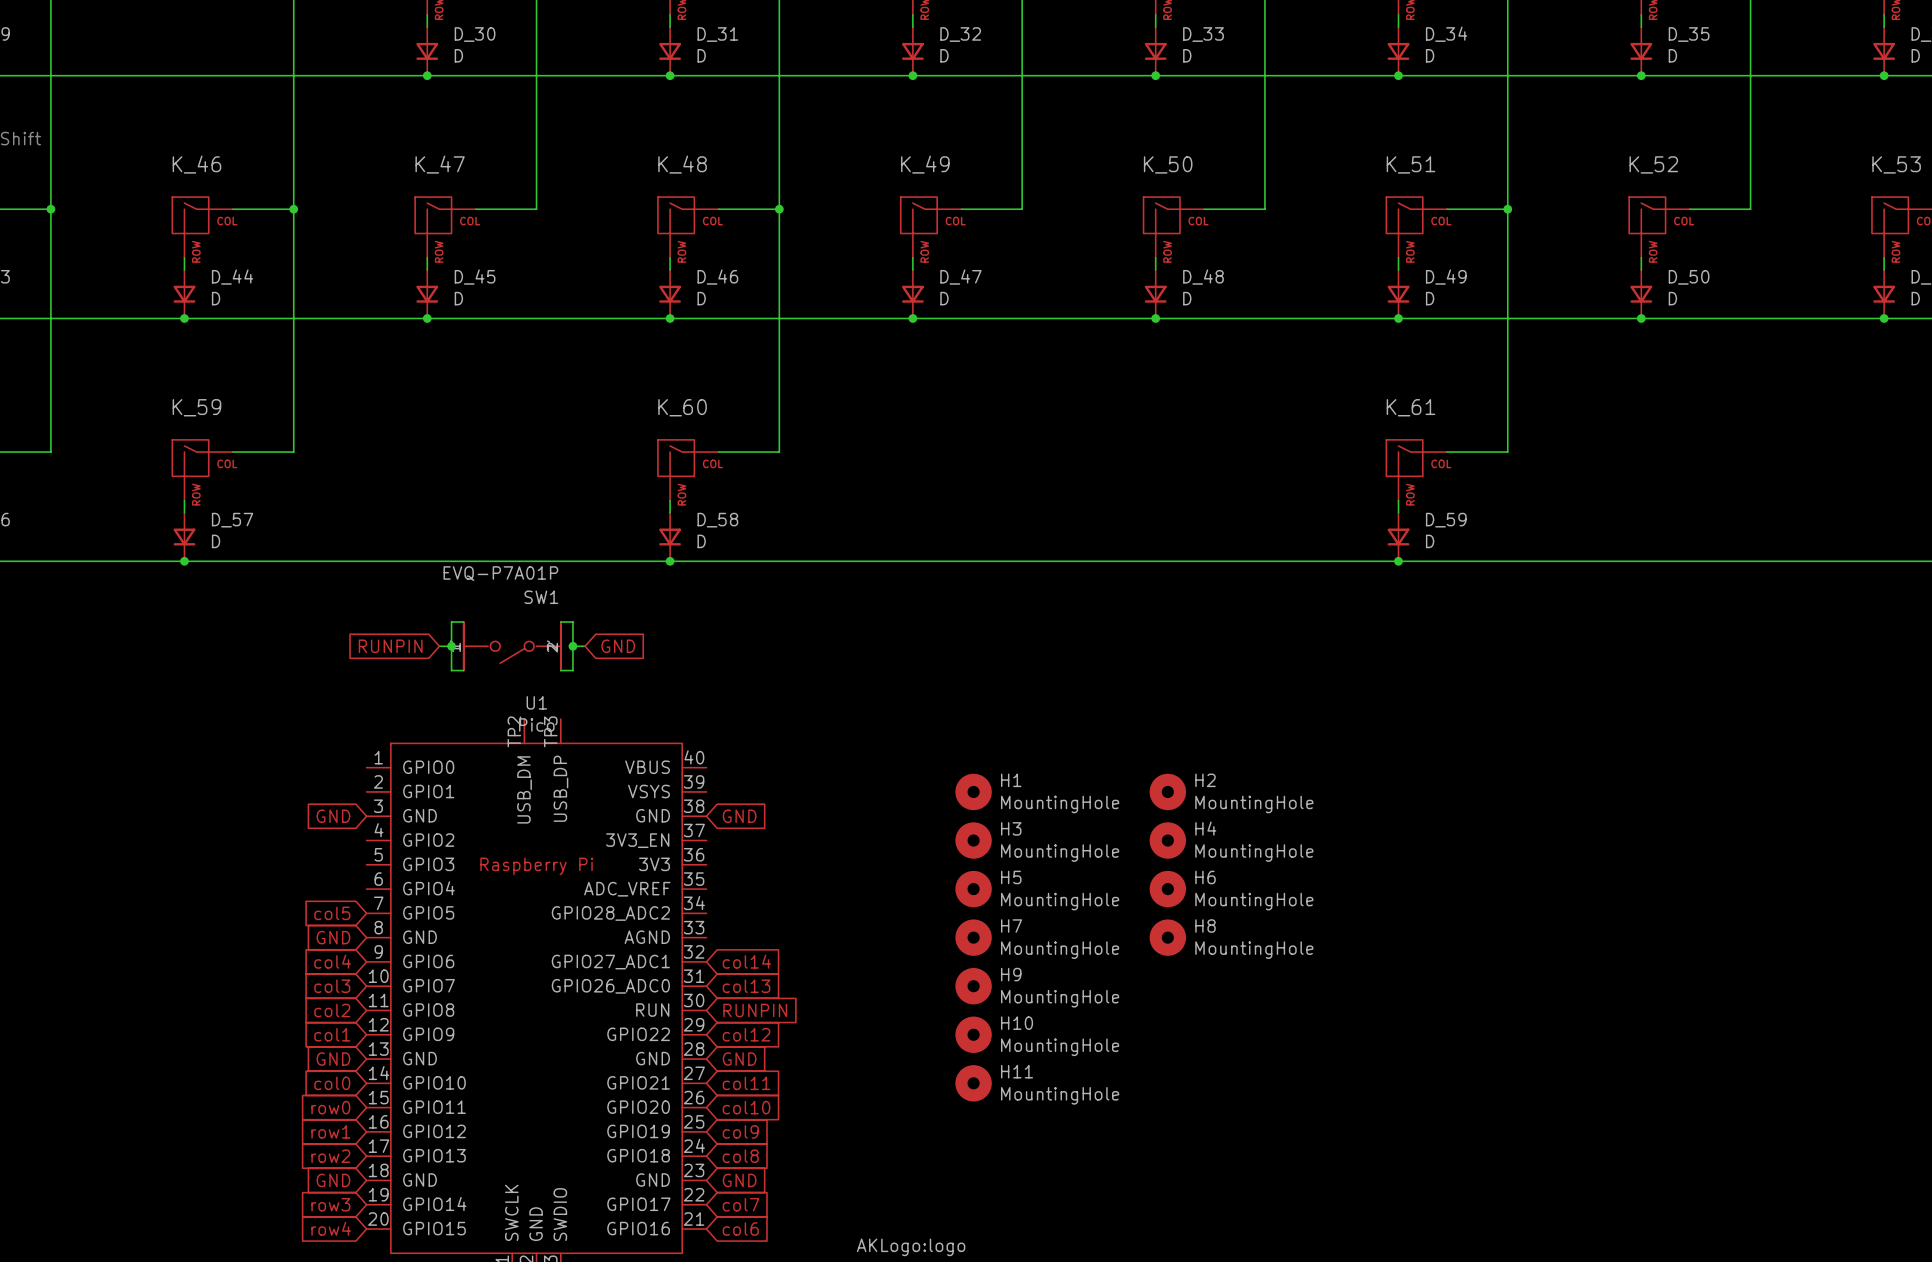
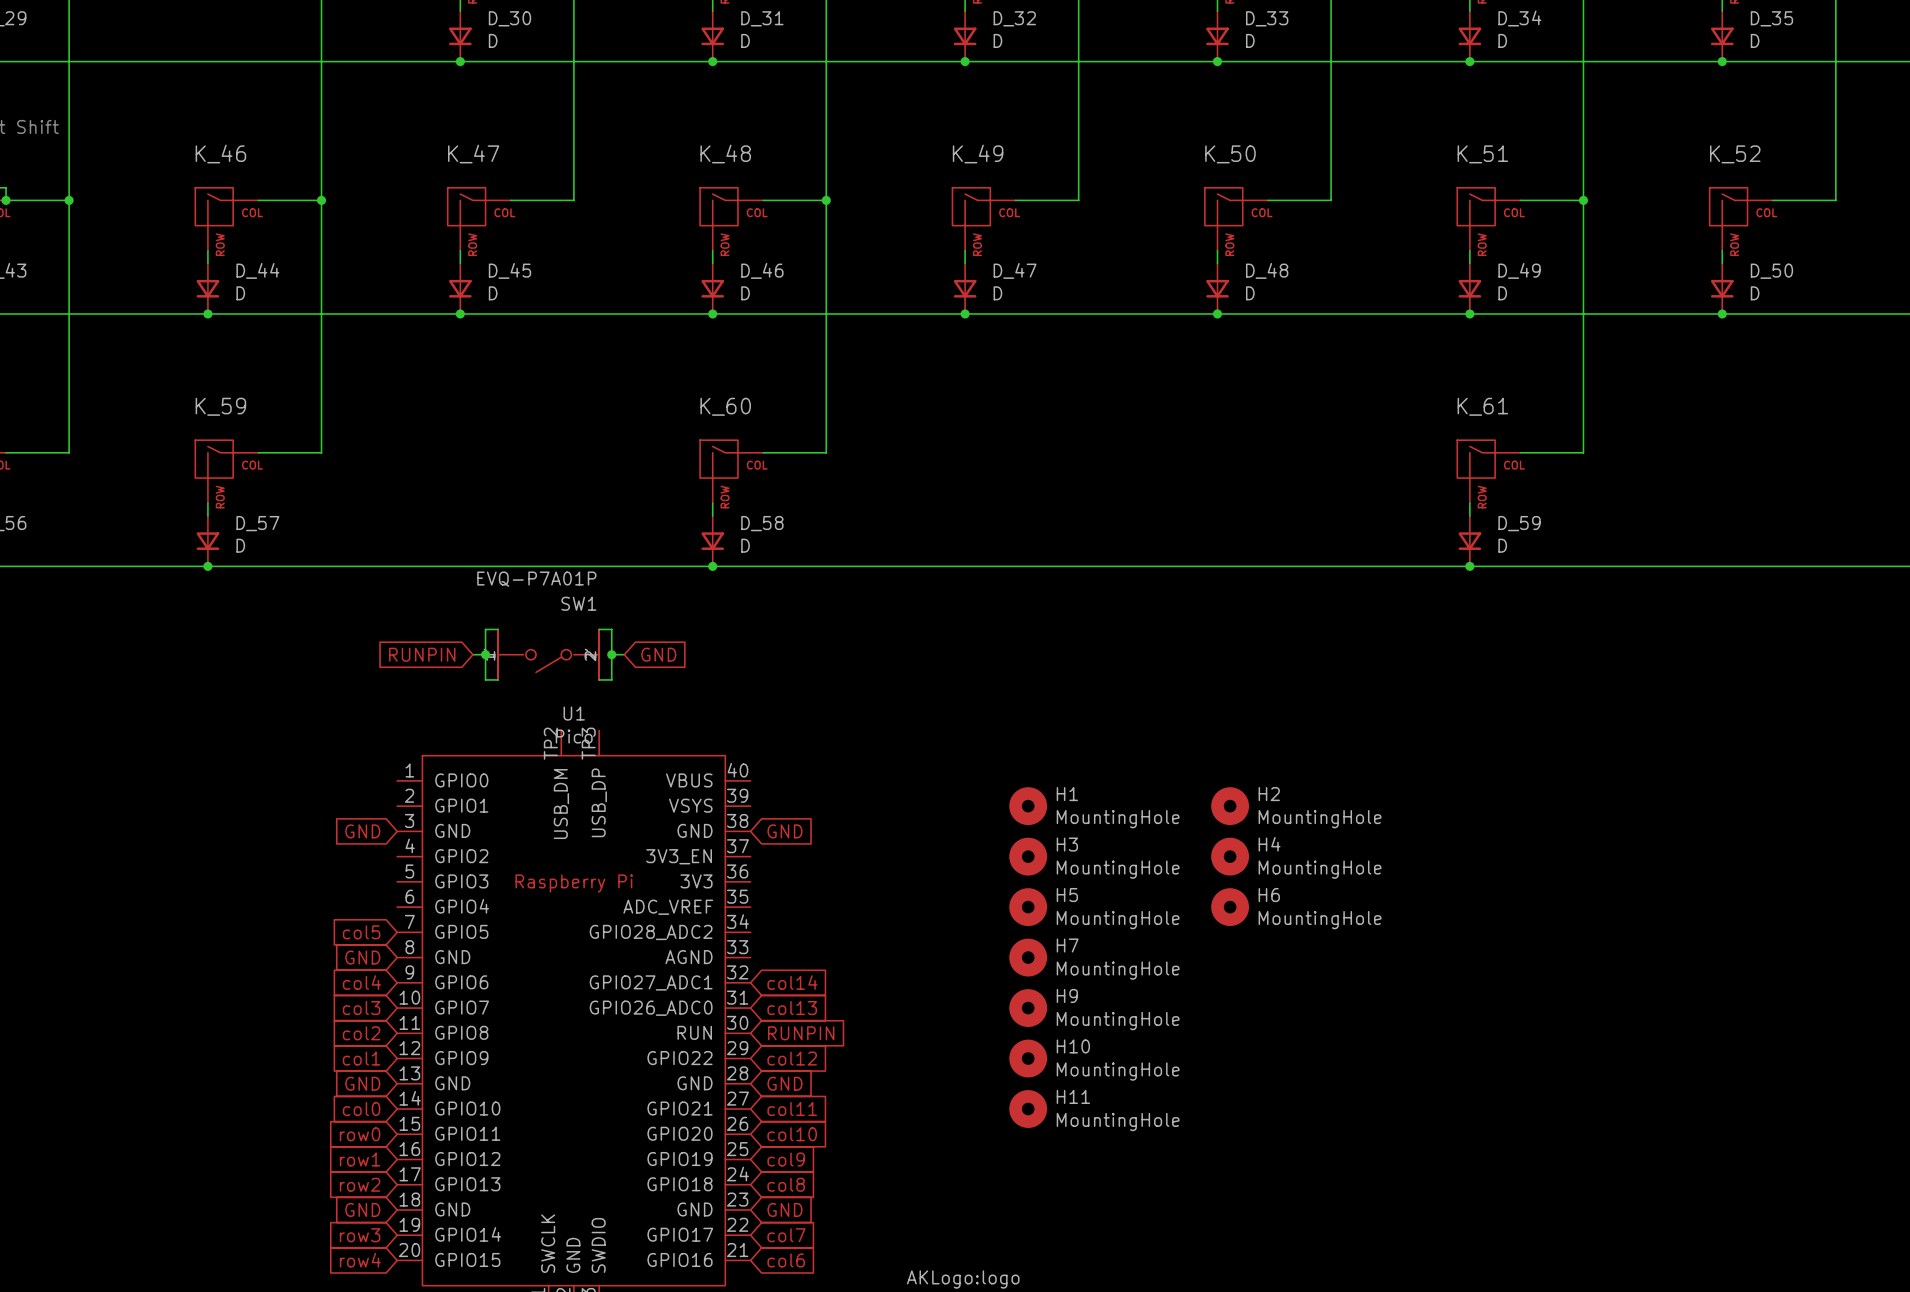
H8: MountingHole (1167, 937) -> none

